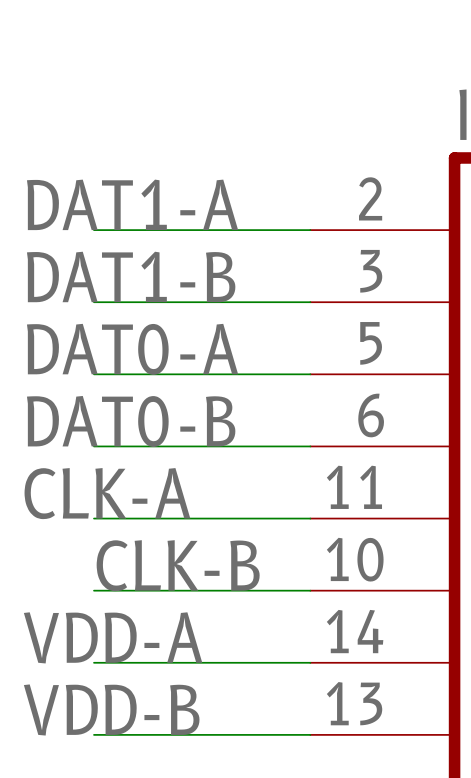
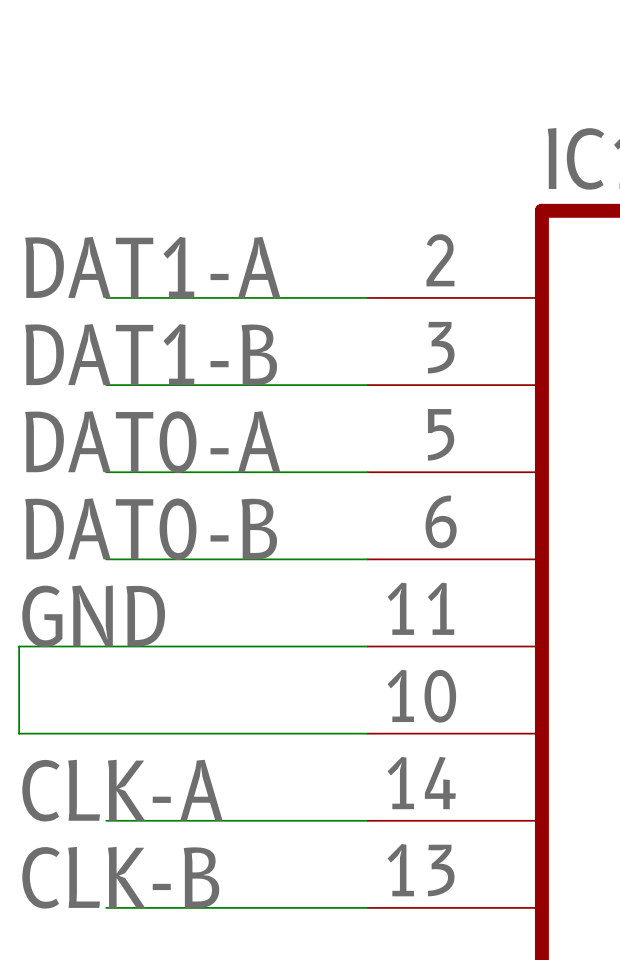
label: CLK-A (107, 493) -> GND (93, 616)
wire: none -> (106, 646) (19, 646) (19, 733) (106, 733)
label: CLK-B (178, 565) -> none
label: VDD-A (113, 637) -> CLK-A (122, 790)
label: VDD-B (111, 709) -> CLK-B (120, 877)

